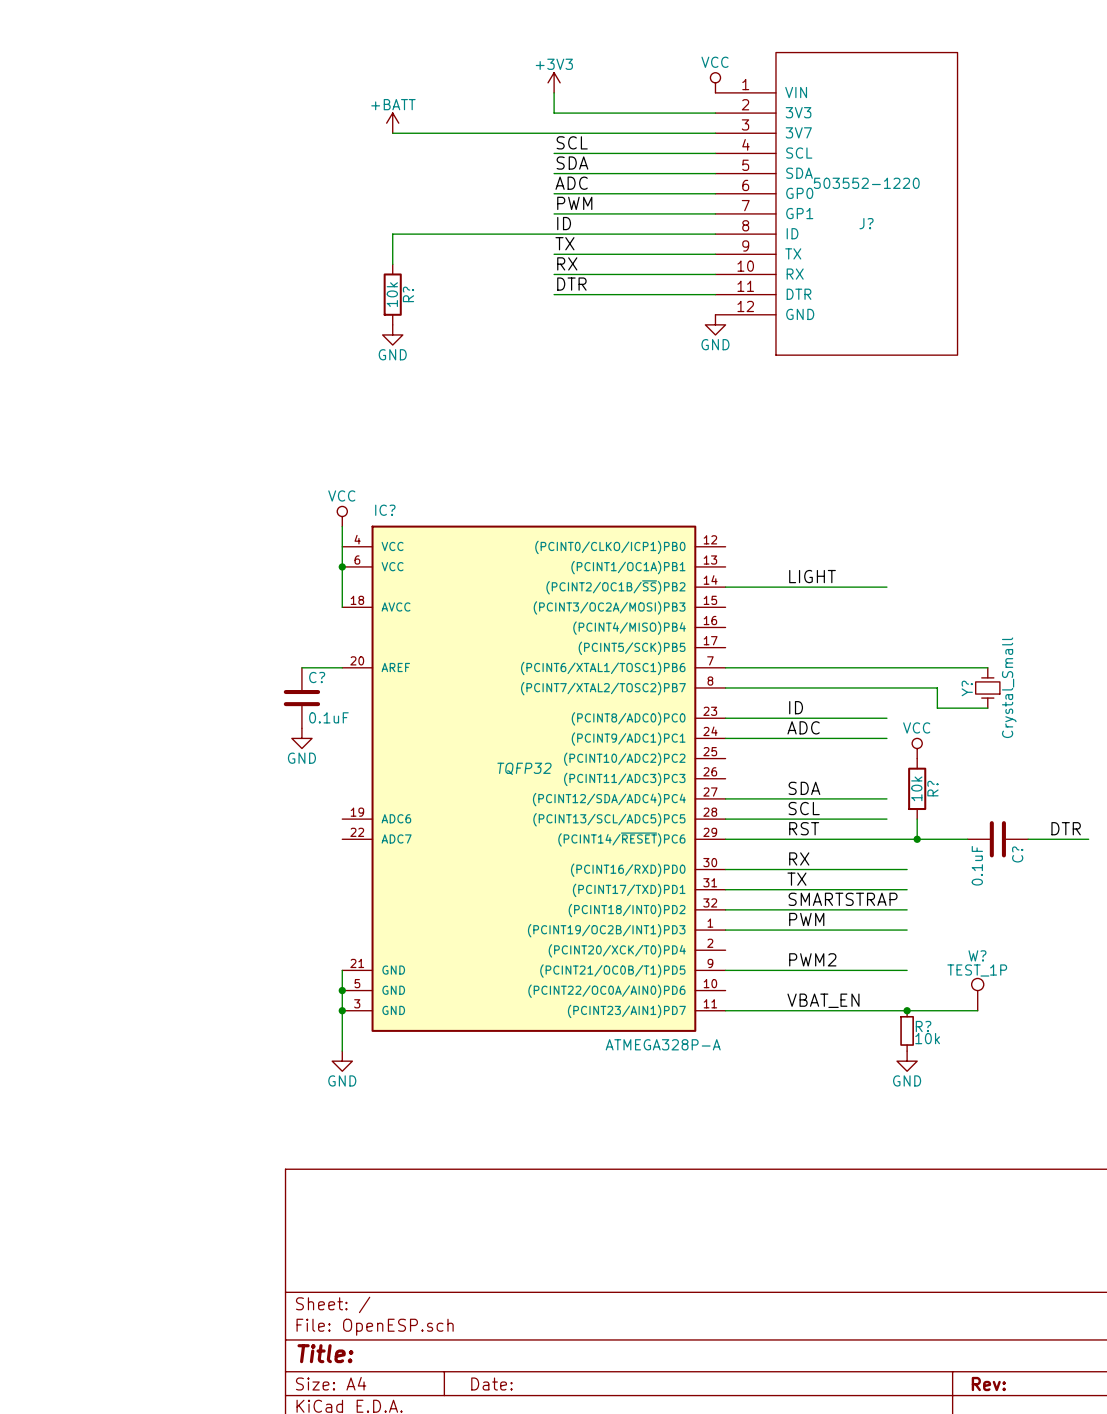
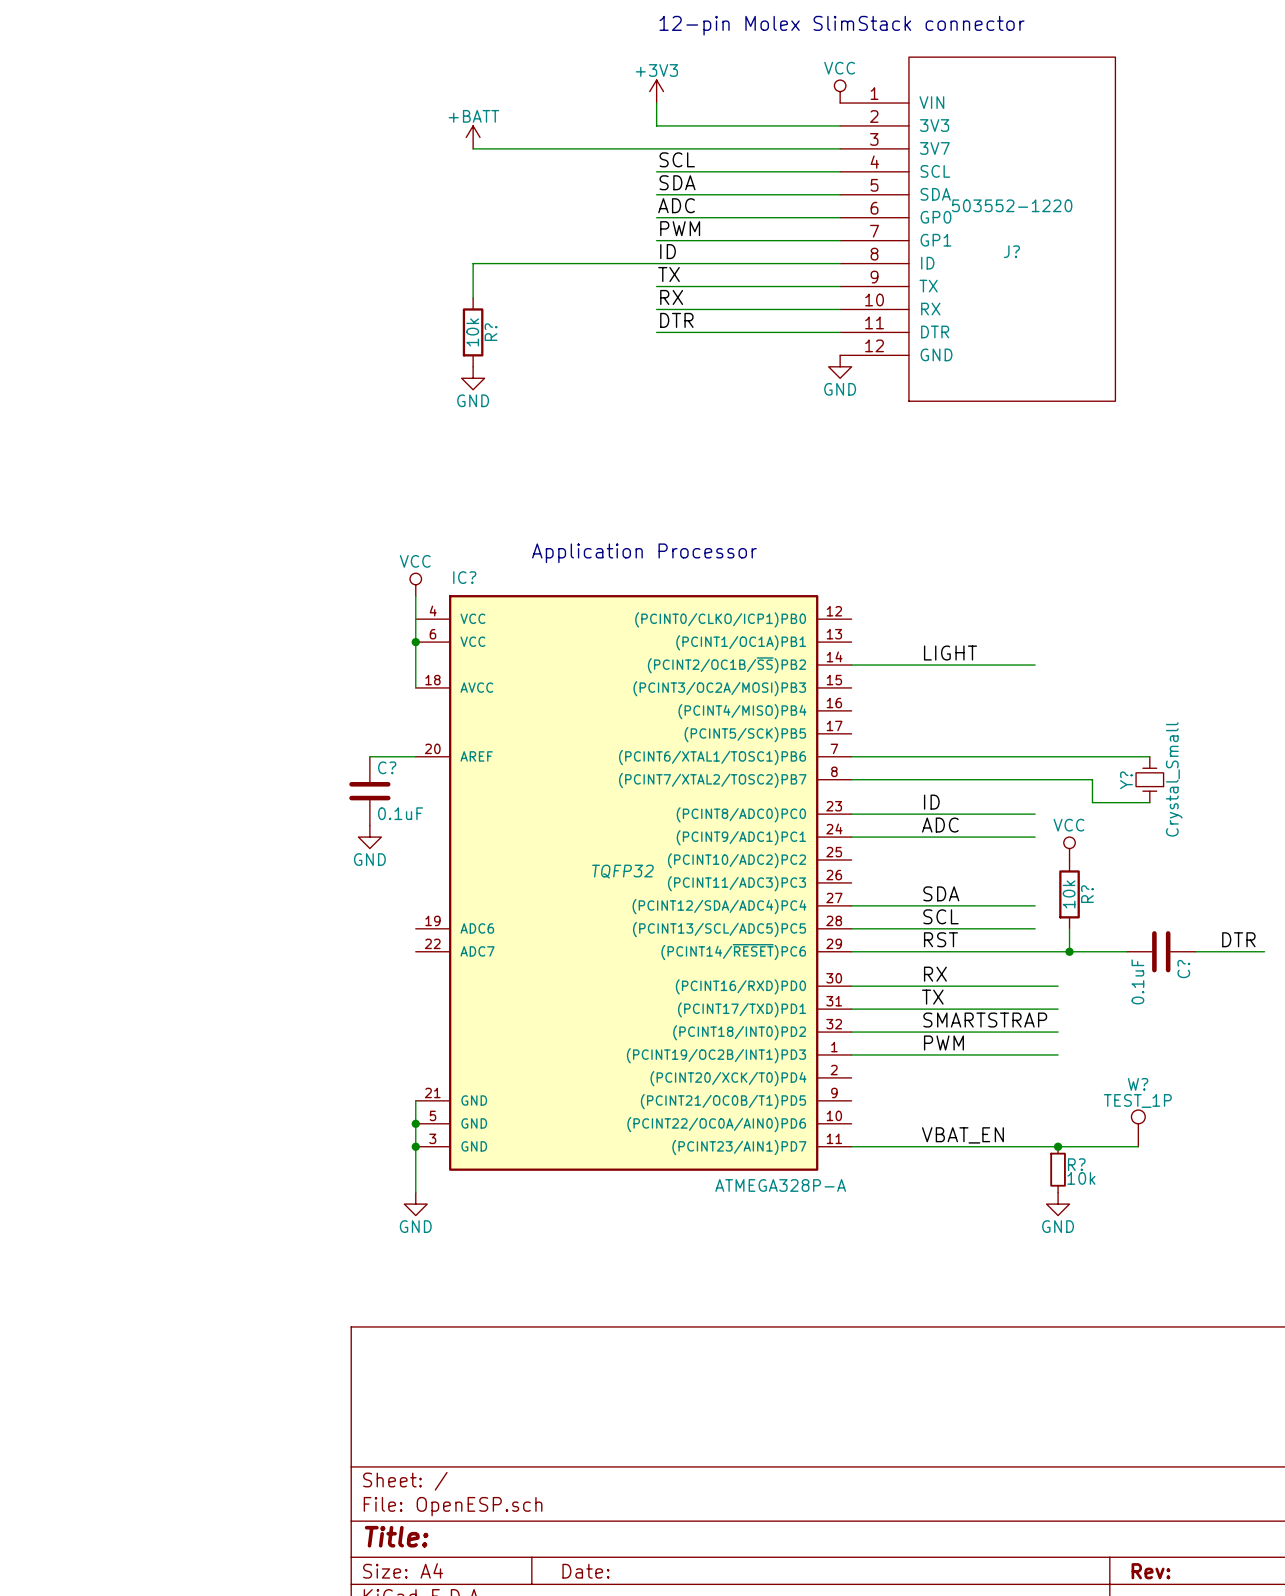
text: none -> 12-pin Molex SlimStack connector (842, 25)
text: none -> Application Processor (644, 553)
label: PWM2 (812, 959) -> none
wire: (725, 970) (907, 970) -> none

